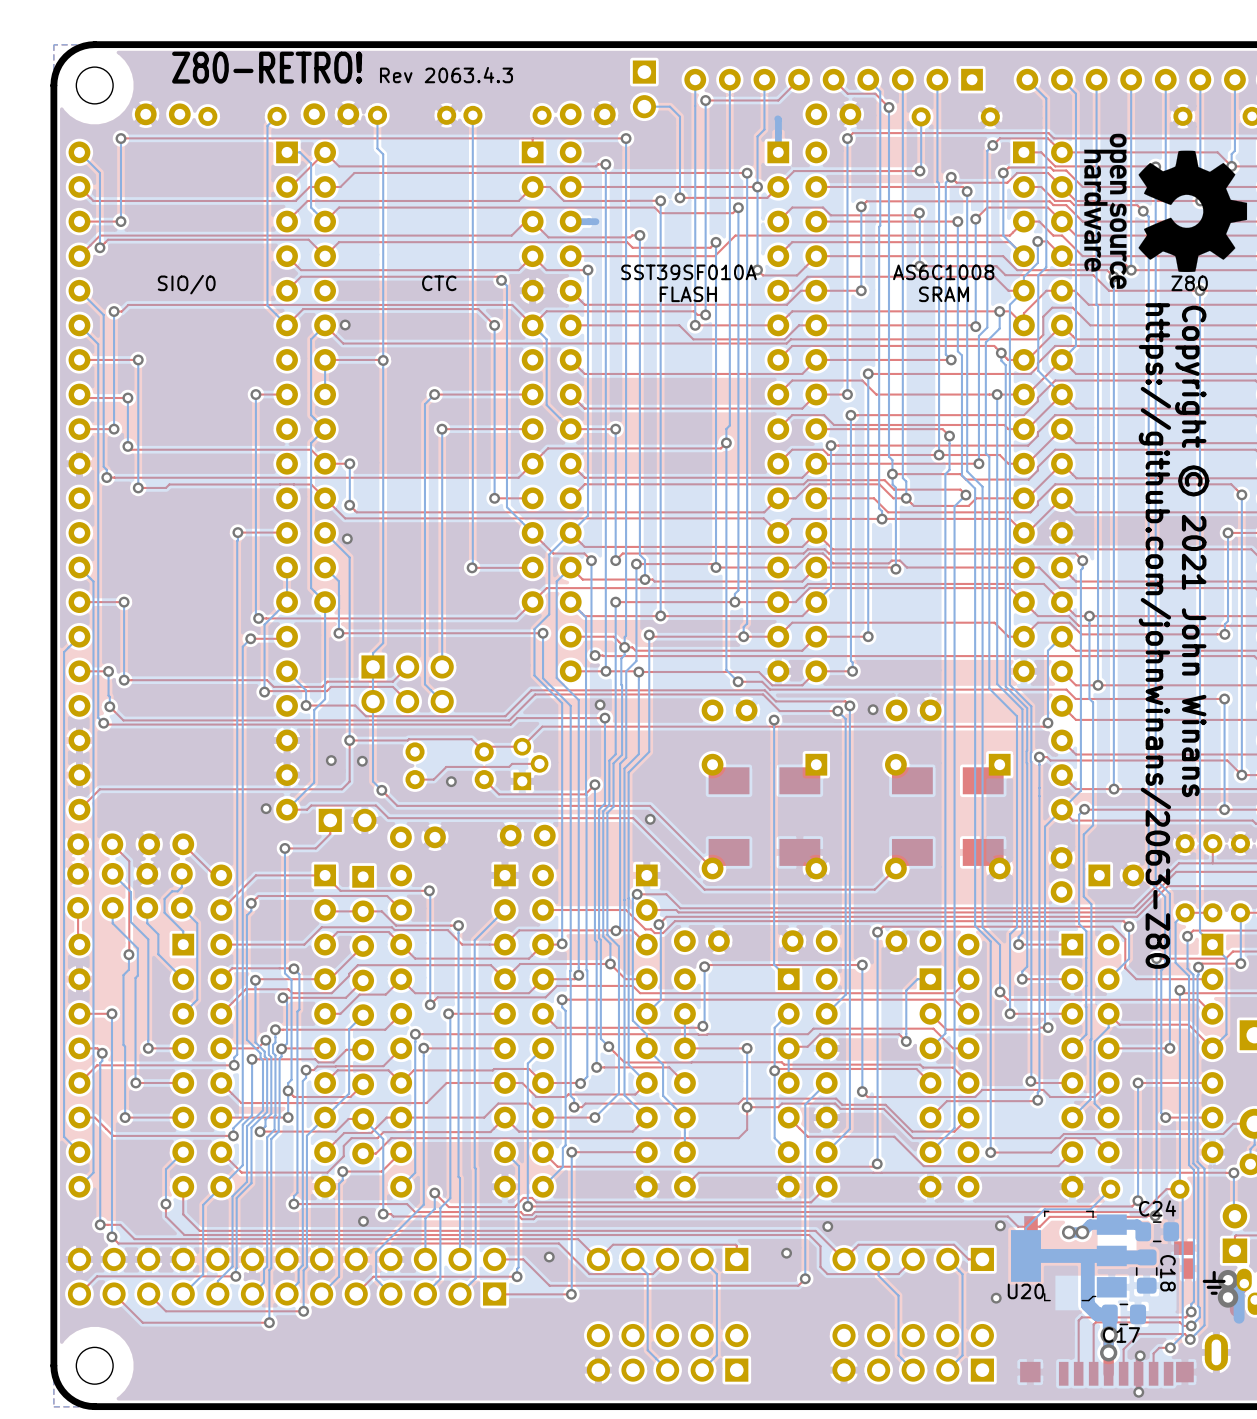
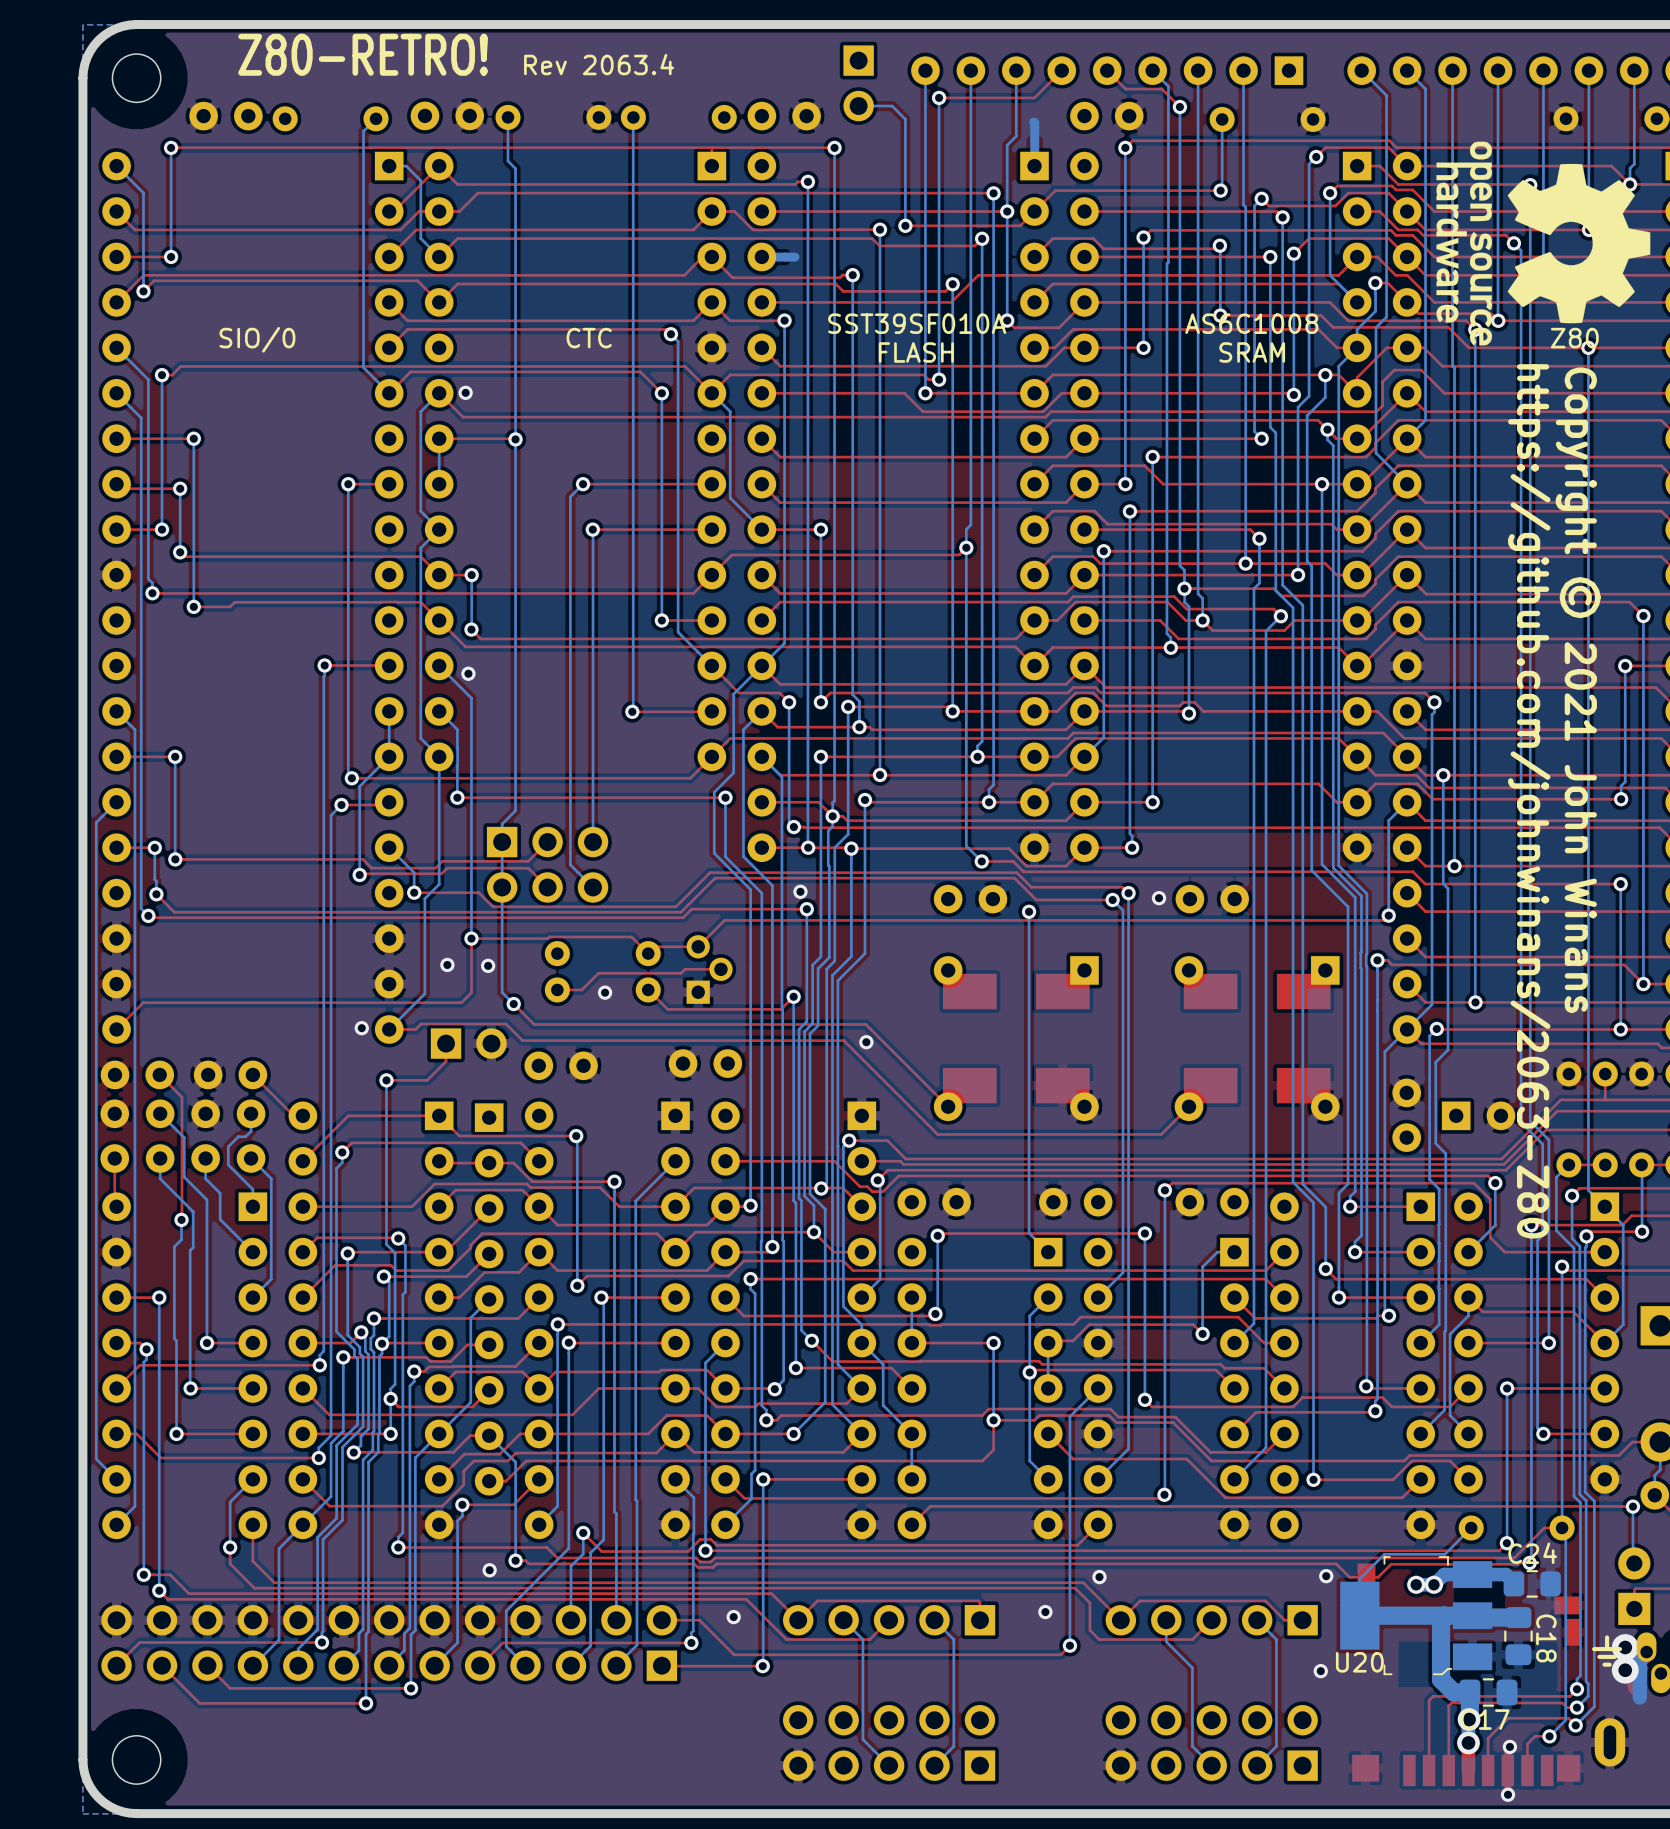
text: Rev 2063.4.3 (446, 75) -> Rev 2063.4 (599, 64)

